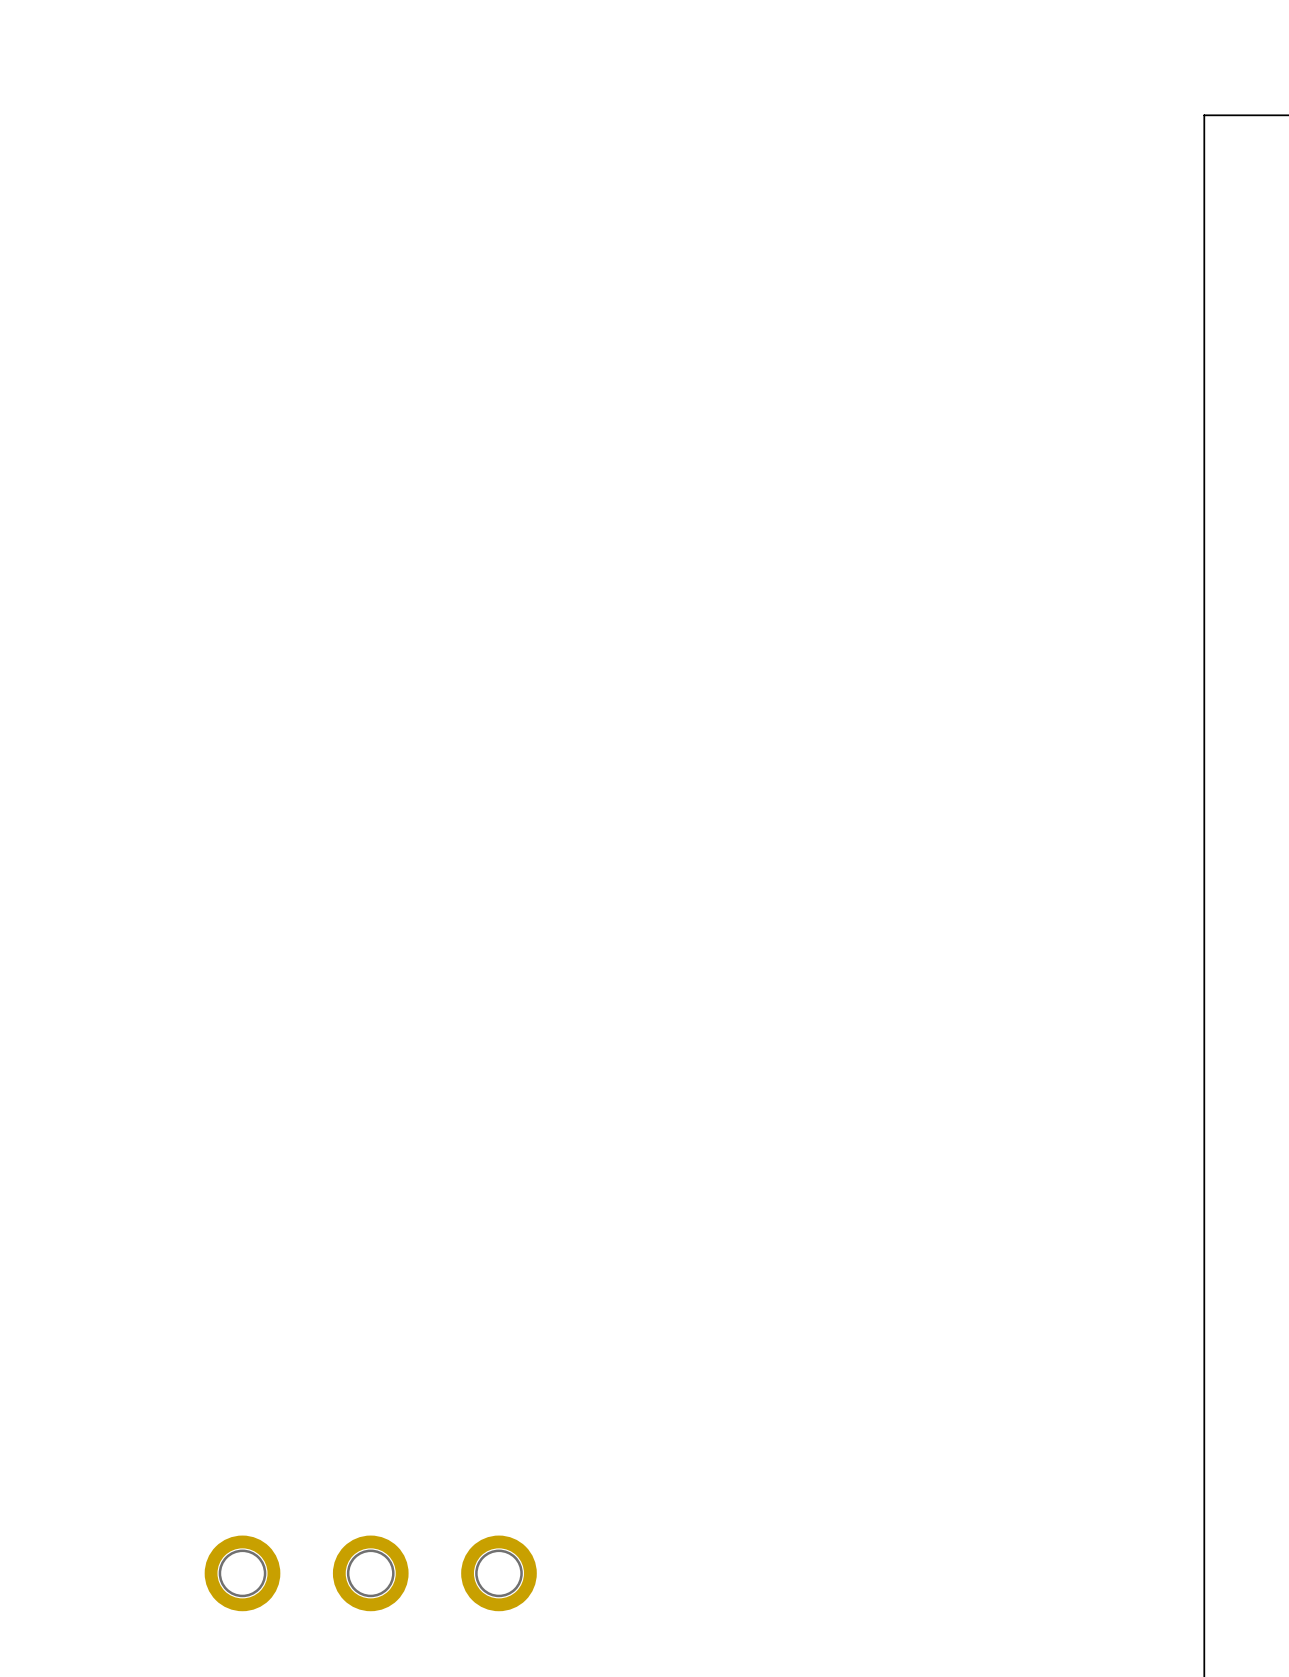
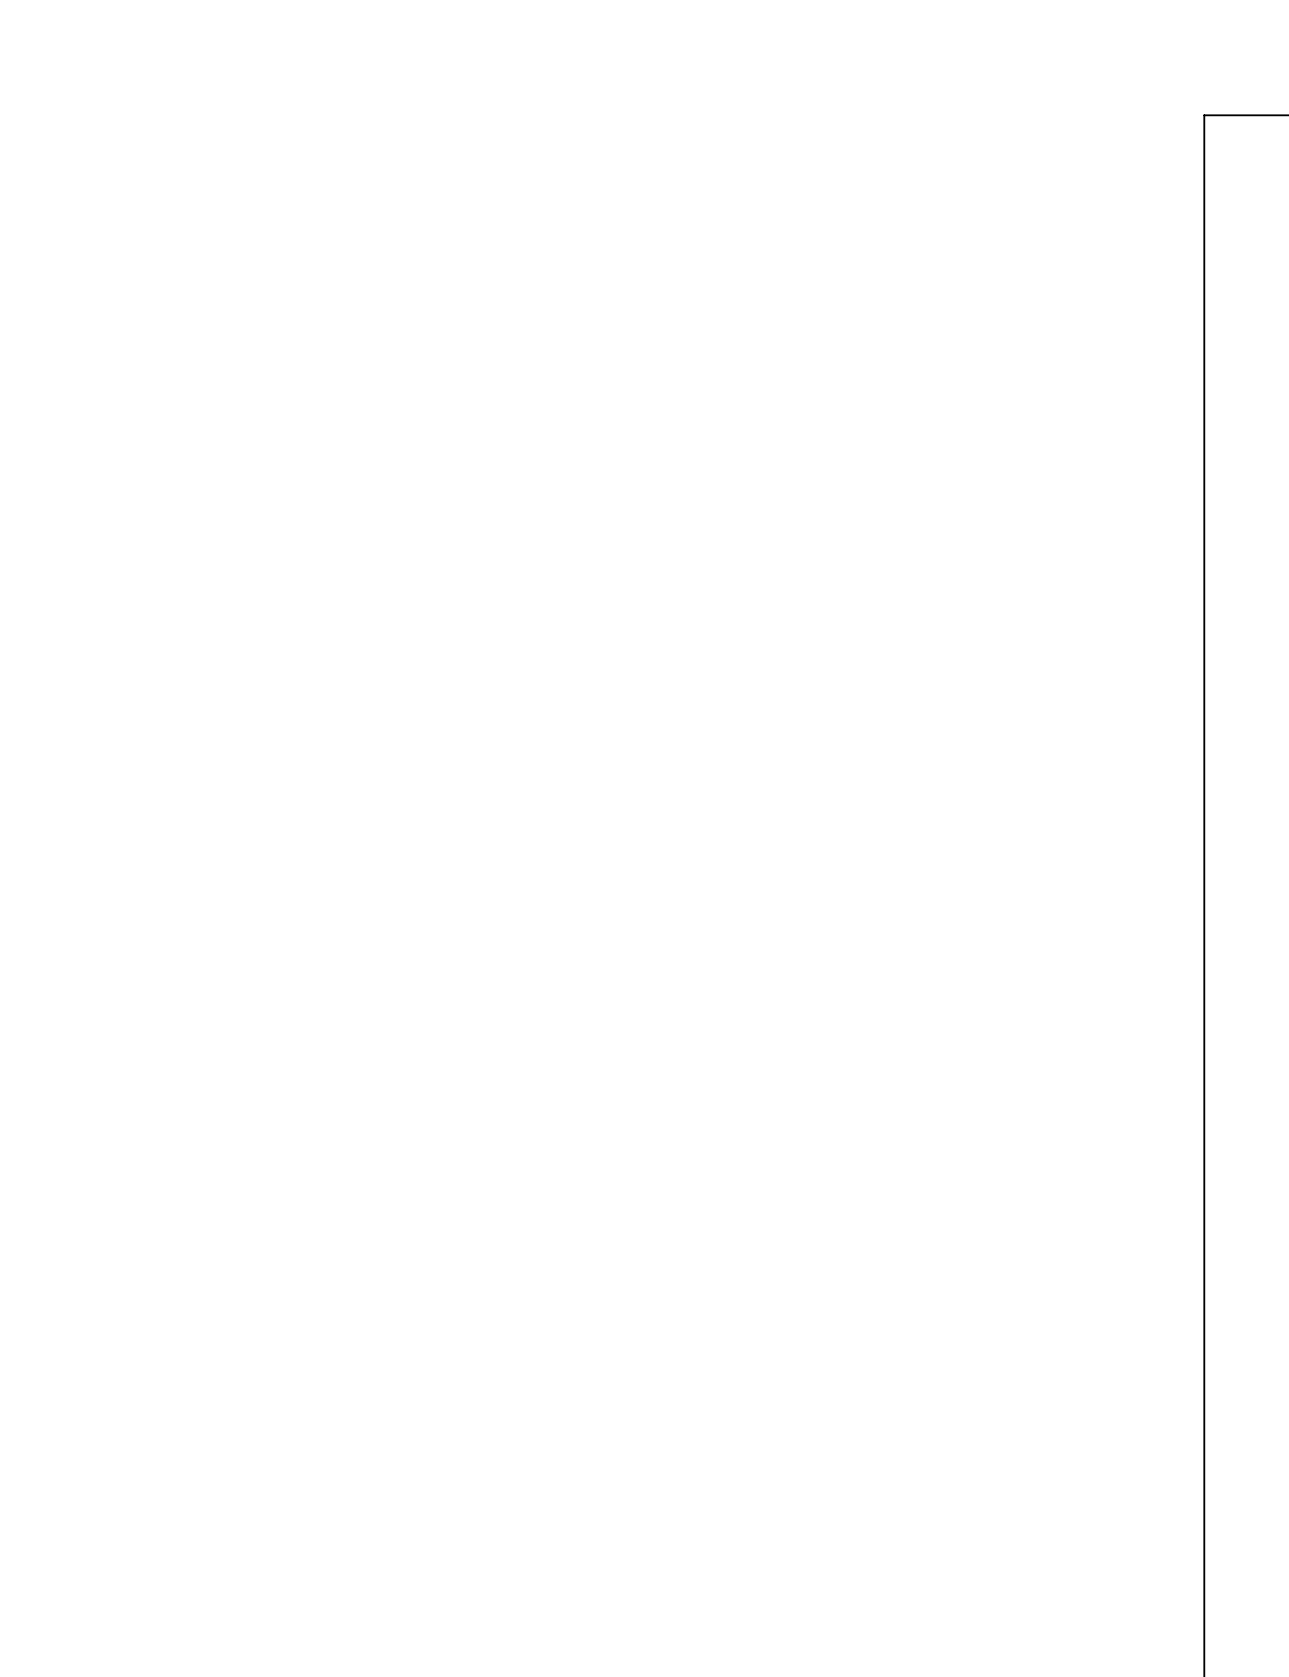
part: (242, 1573) -> none
part: (370, 1573) -> none
part: (498, 1573) -> none

